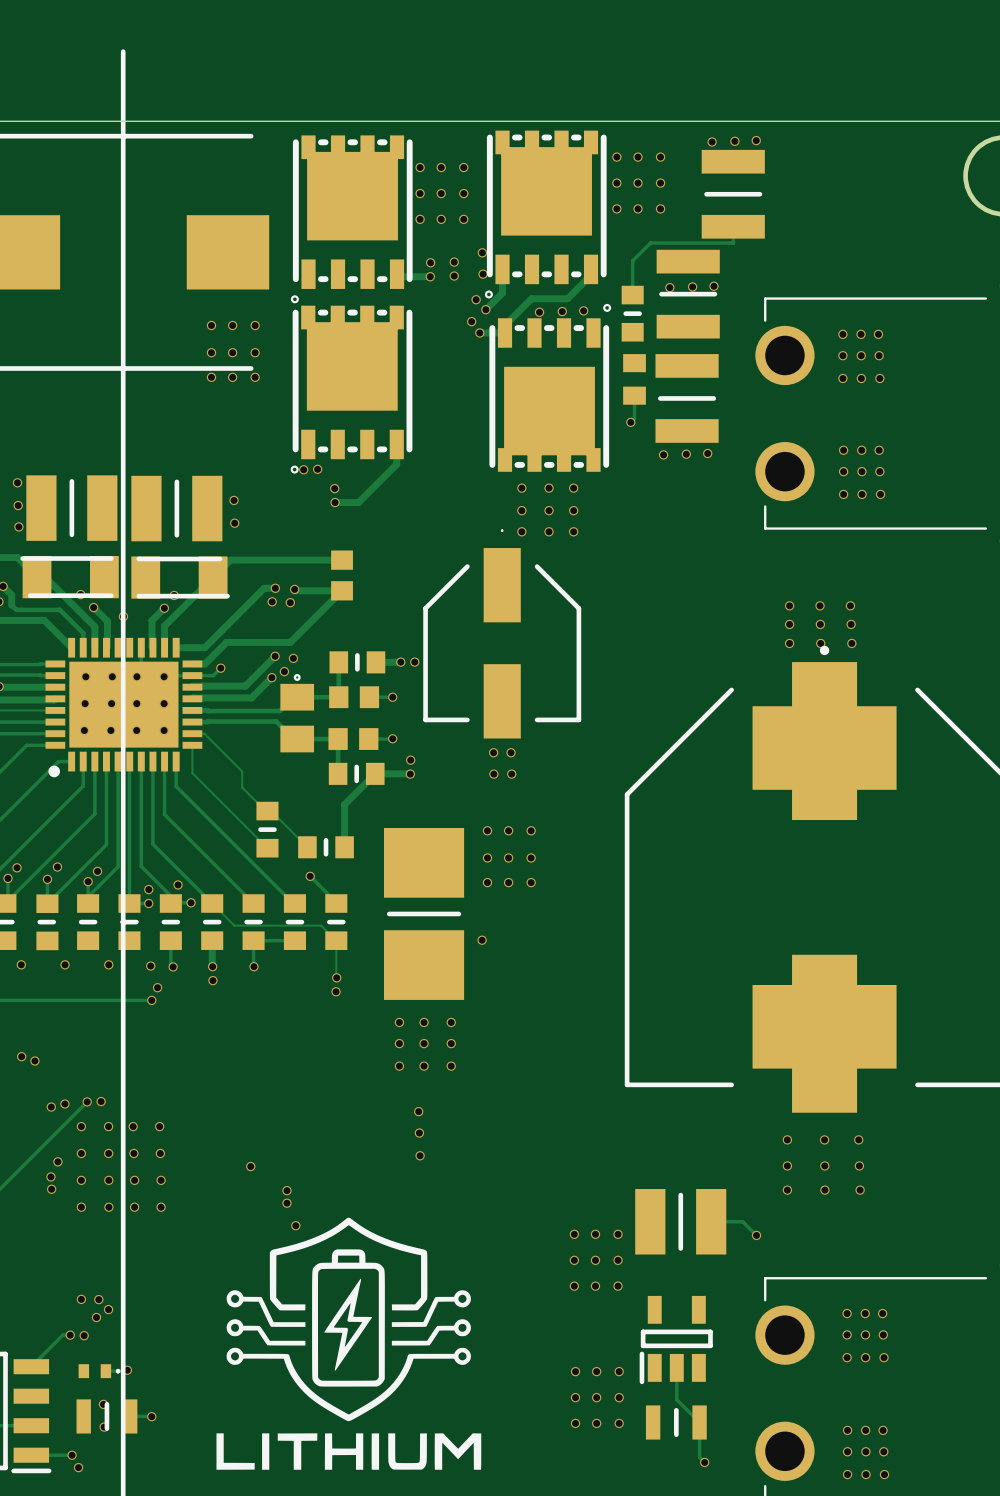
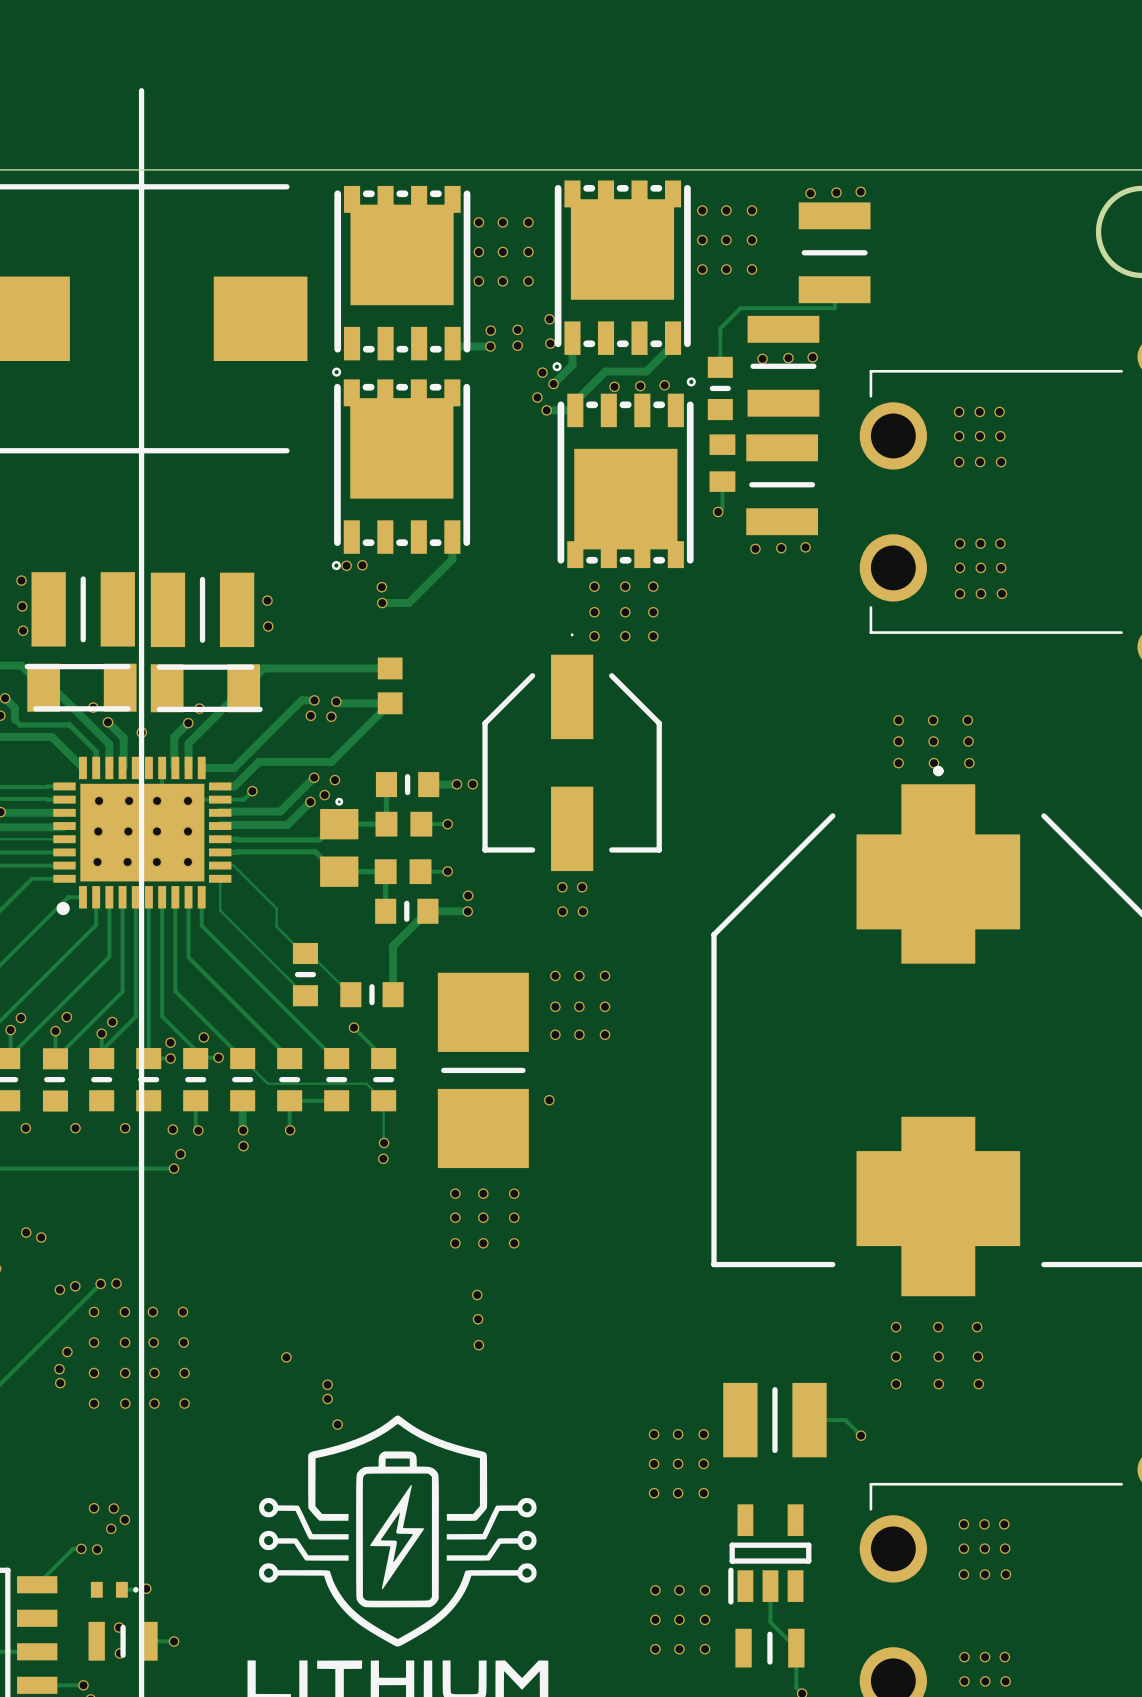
via: (211, 325) -> none
via: (232, 325) -> none
via: (255, 325) -> none
via: (211, 352) -> none
via: (232, 352) -> none
via: (255, 352) -> none
via: (211, 377) -> none
via: (232, 377) -> none
via: (255, 377) -> none

